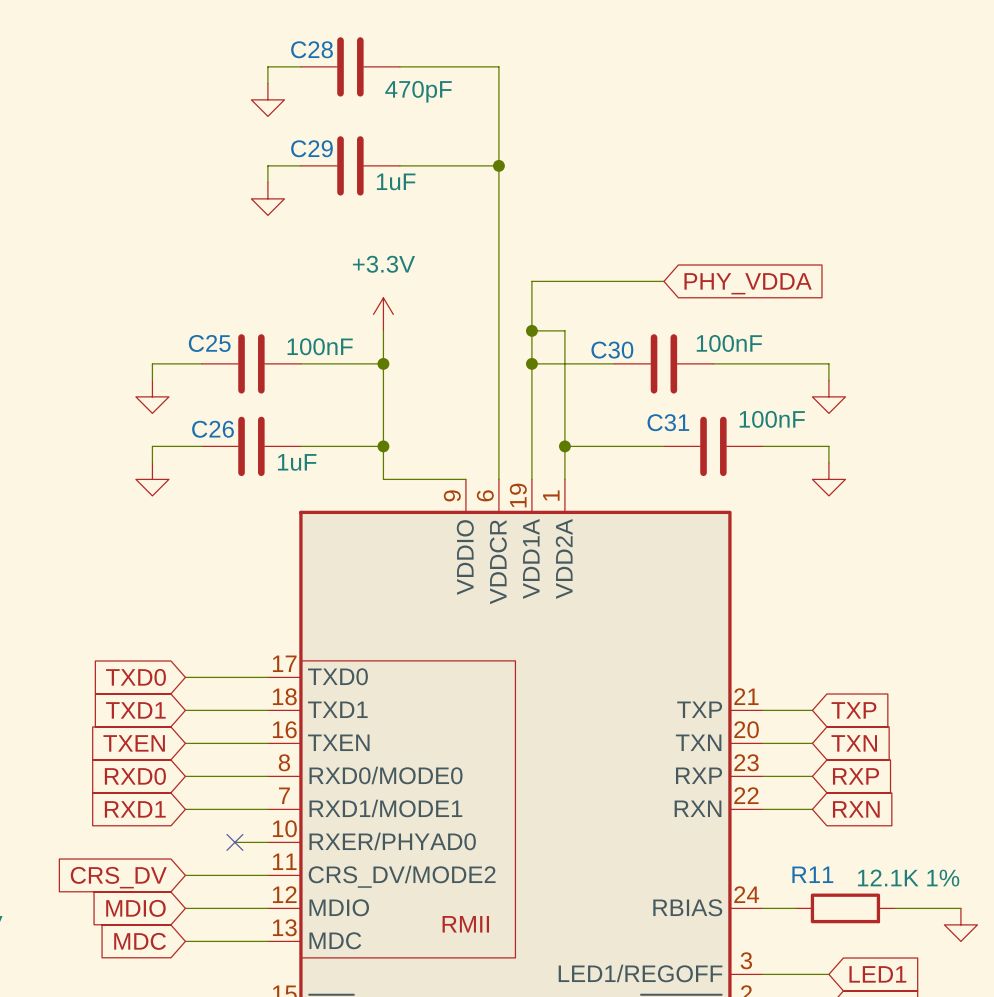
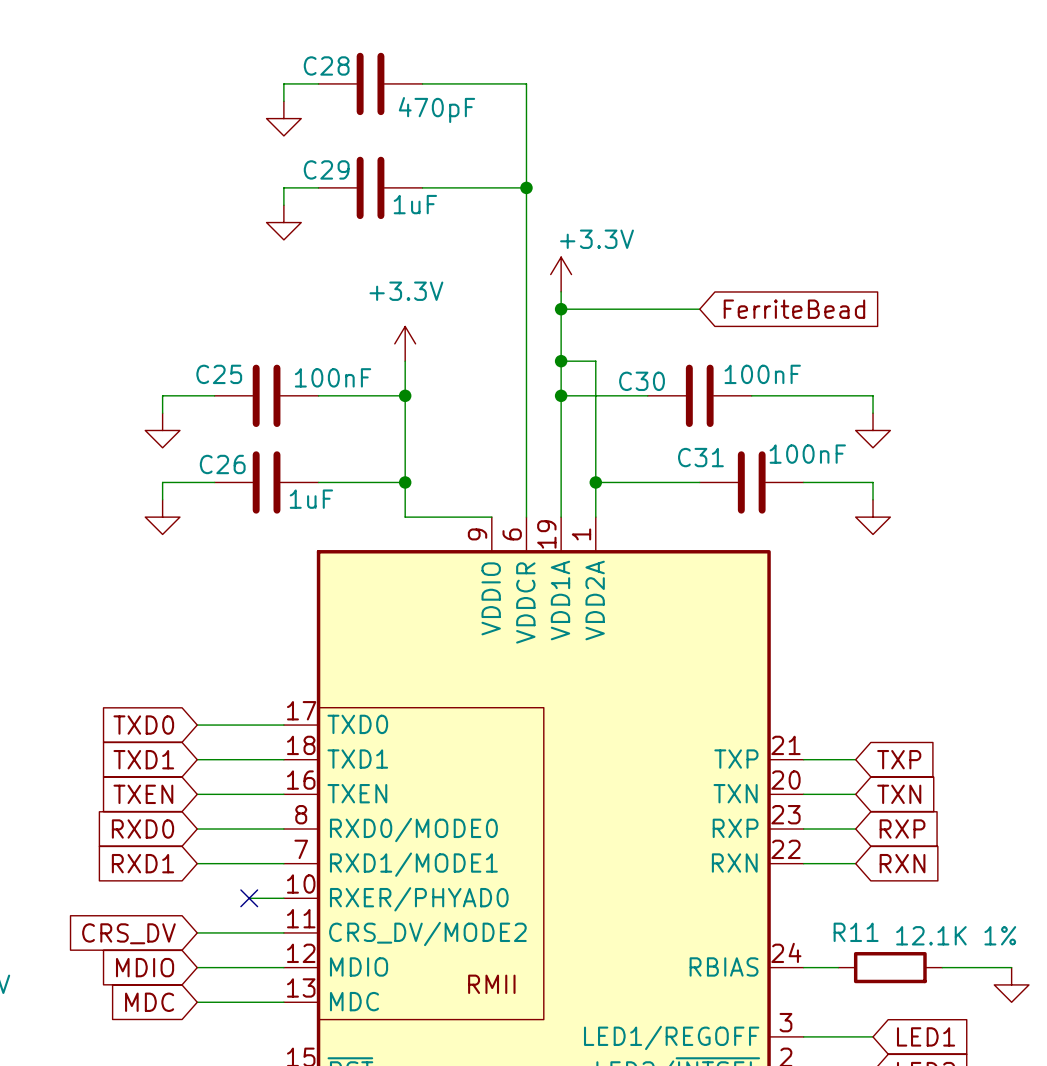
power symbol: none -> +3.3V (561, 274)
wire: none -> (561, 291) (561, 309)
junction: none -> (561, 309)
global label: PHY_VDDA (748, 283) -> FerriteBead (794, 309)

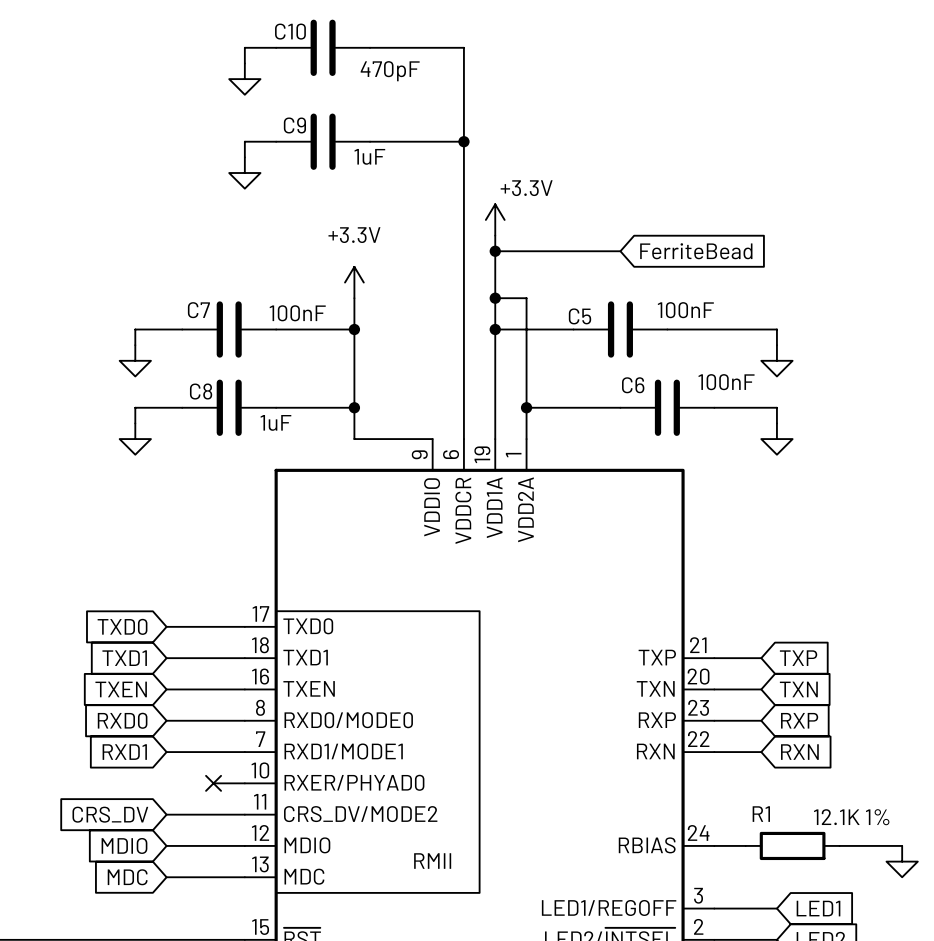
C28 name: C28 (326, 65) -> C10 (290, 31)
C29 name: C29 (326, 169) -> C9 (294, 125)
C25 name: C25 (219, 374) -> C7 (198, 310)
C30 name: C30 (642, 381) -> C5 (580, 316)
C31 name: C31 (700, 457) -> C6 (633, 385)
C26 name: C26 (222, 464) -> C8 (201, 391)
R11 name: R11 (856, 932) -> R1 (761, 814)

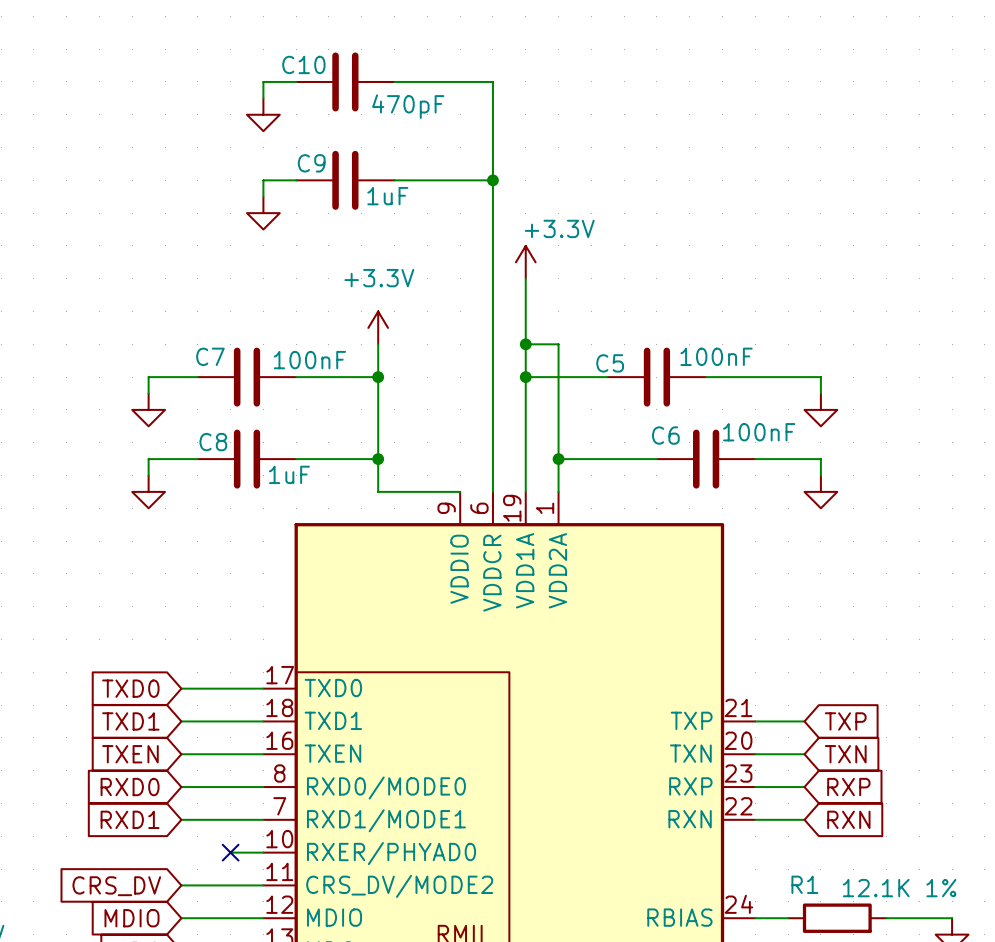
wire: (495, 251) (620, 251) -> none
junction: (495, 251) -> none
global label: FerriteBead (696, 251) -> none

